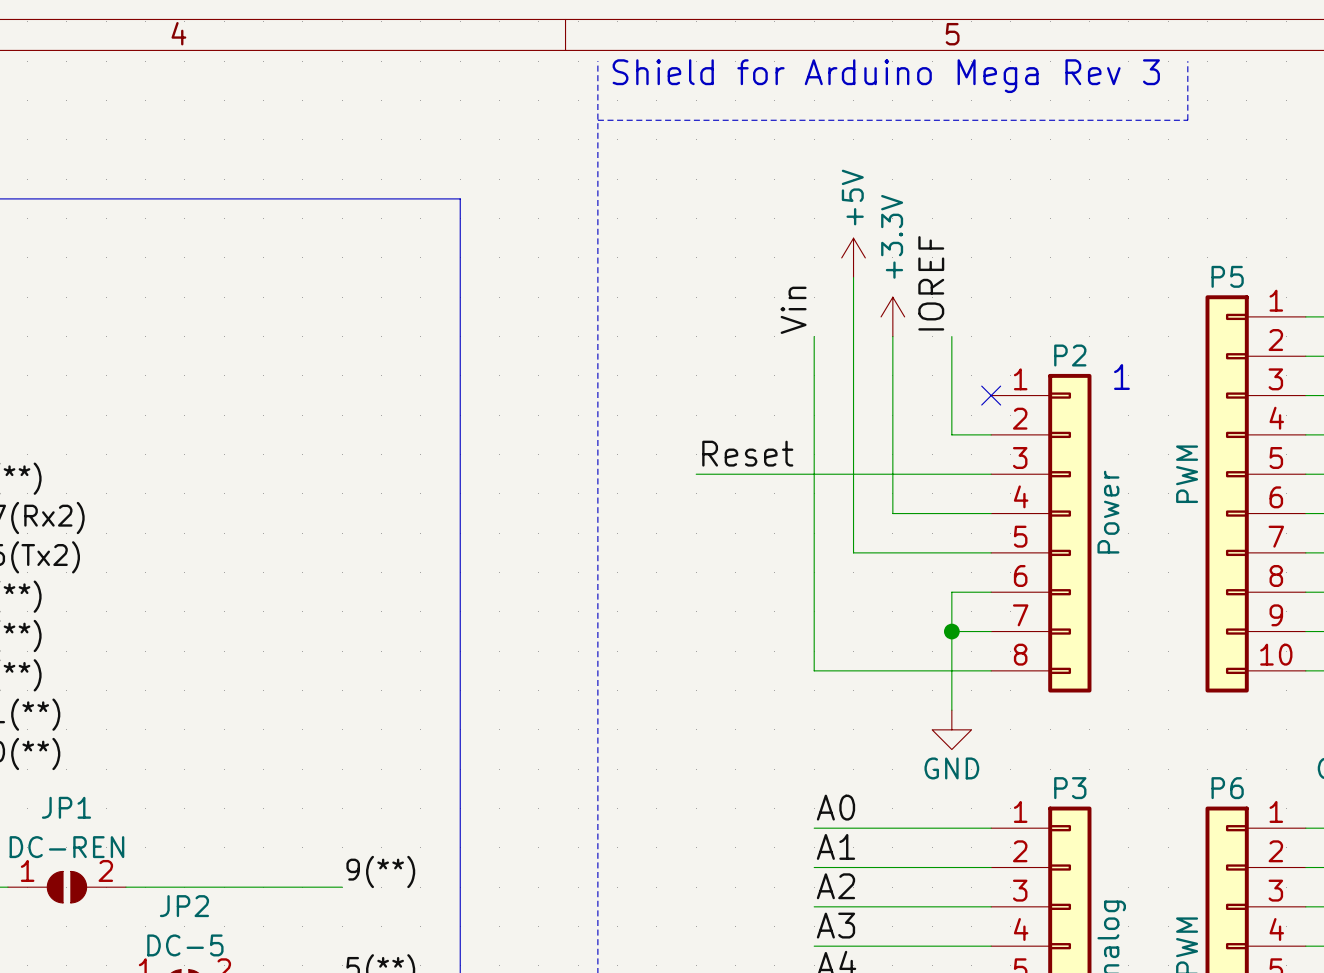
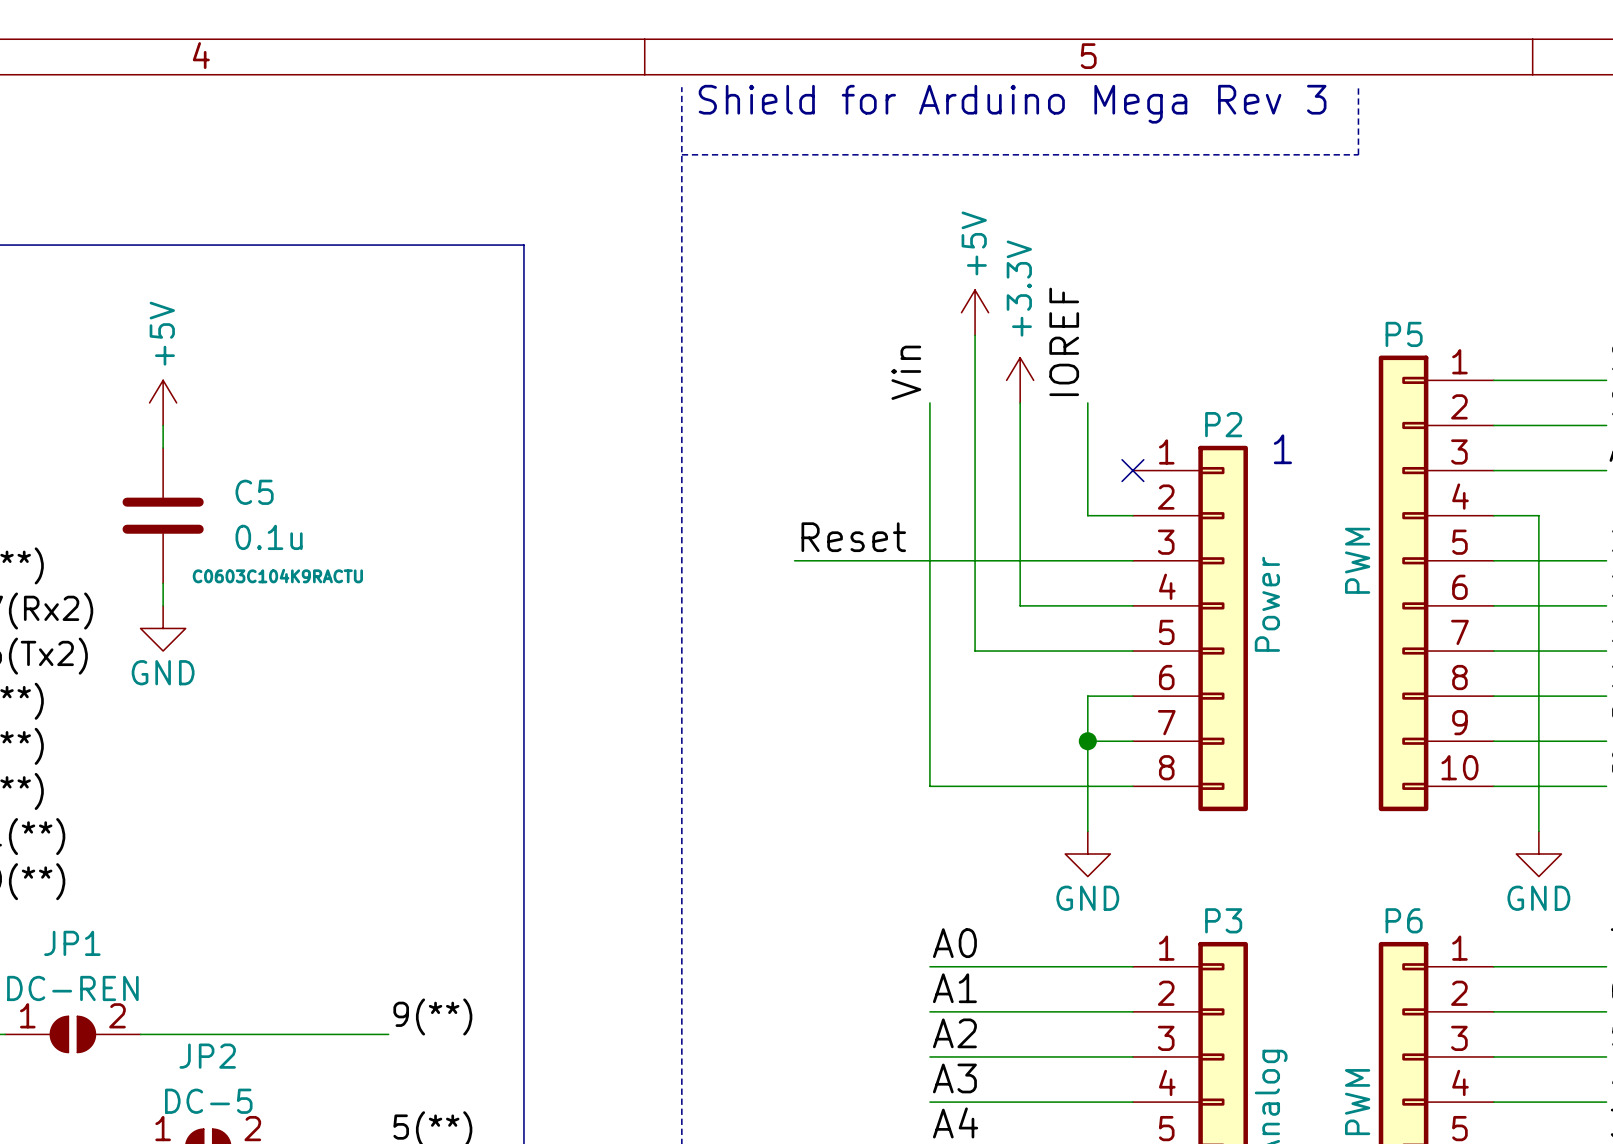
power symbol: none -> +5V (163, 402)
wire: none -> (163, 425) (163, 448)
C5: none -> 0.1u (163, 515)
wire: none -> (163, 583) (163, 605)
power symbol: none -> GND (163, 628)

